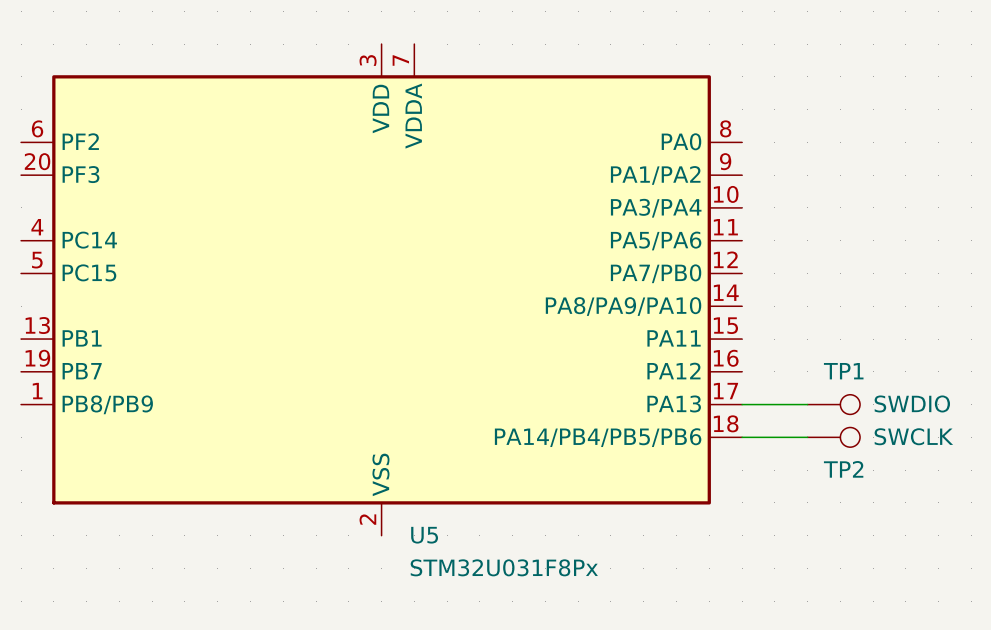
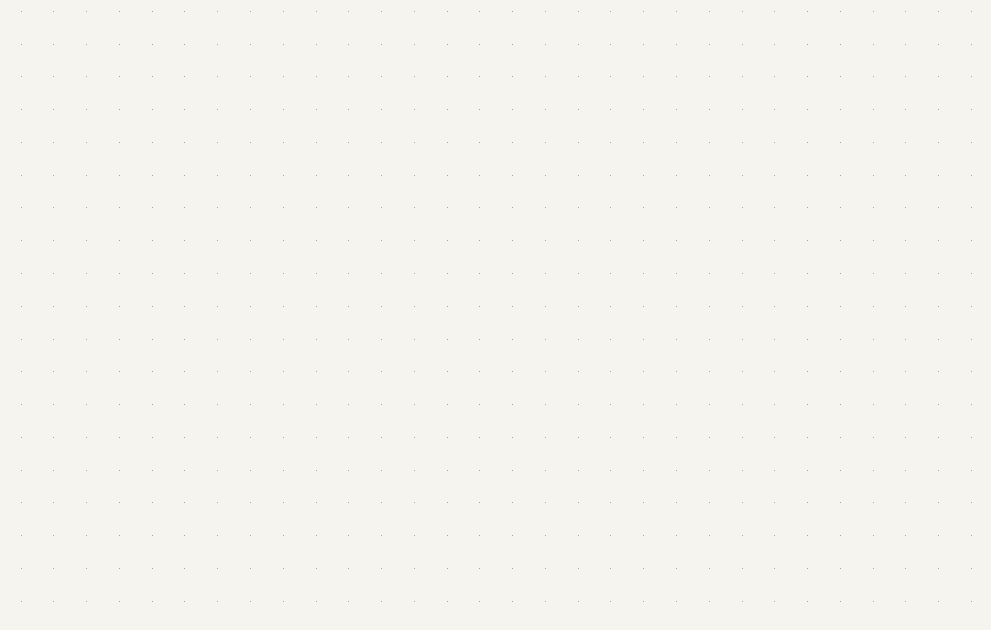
U5: STM32U031F8Px (381, 289) -> none
wire: (742, 404) (807, 404) -> none
TP1: SWDIO (833, 404) -> none
wire: (742, 437) (807, 437) -> none
TP2: SWCLK (833, 437) -> none

